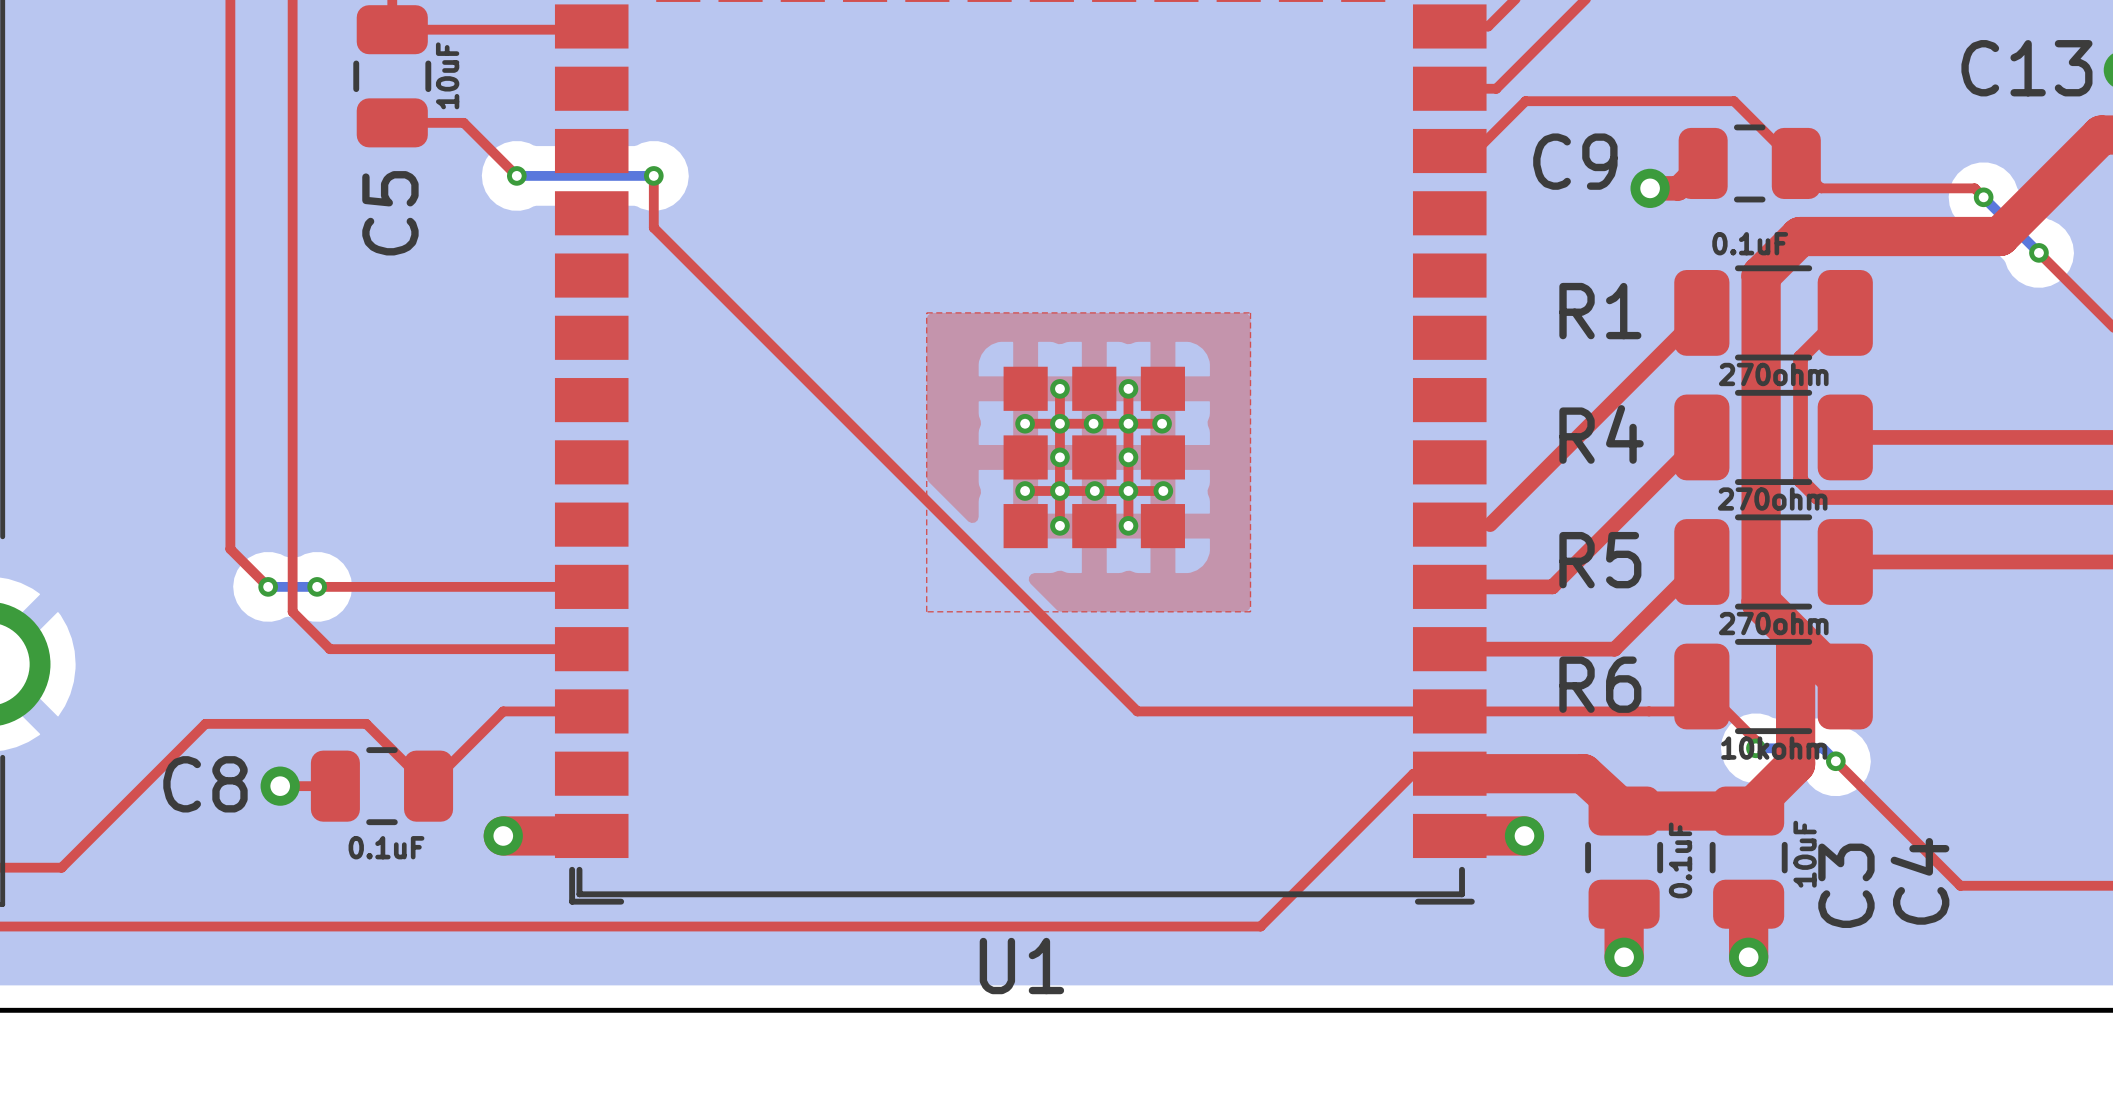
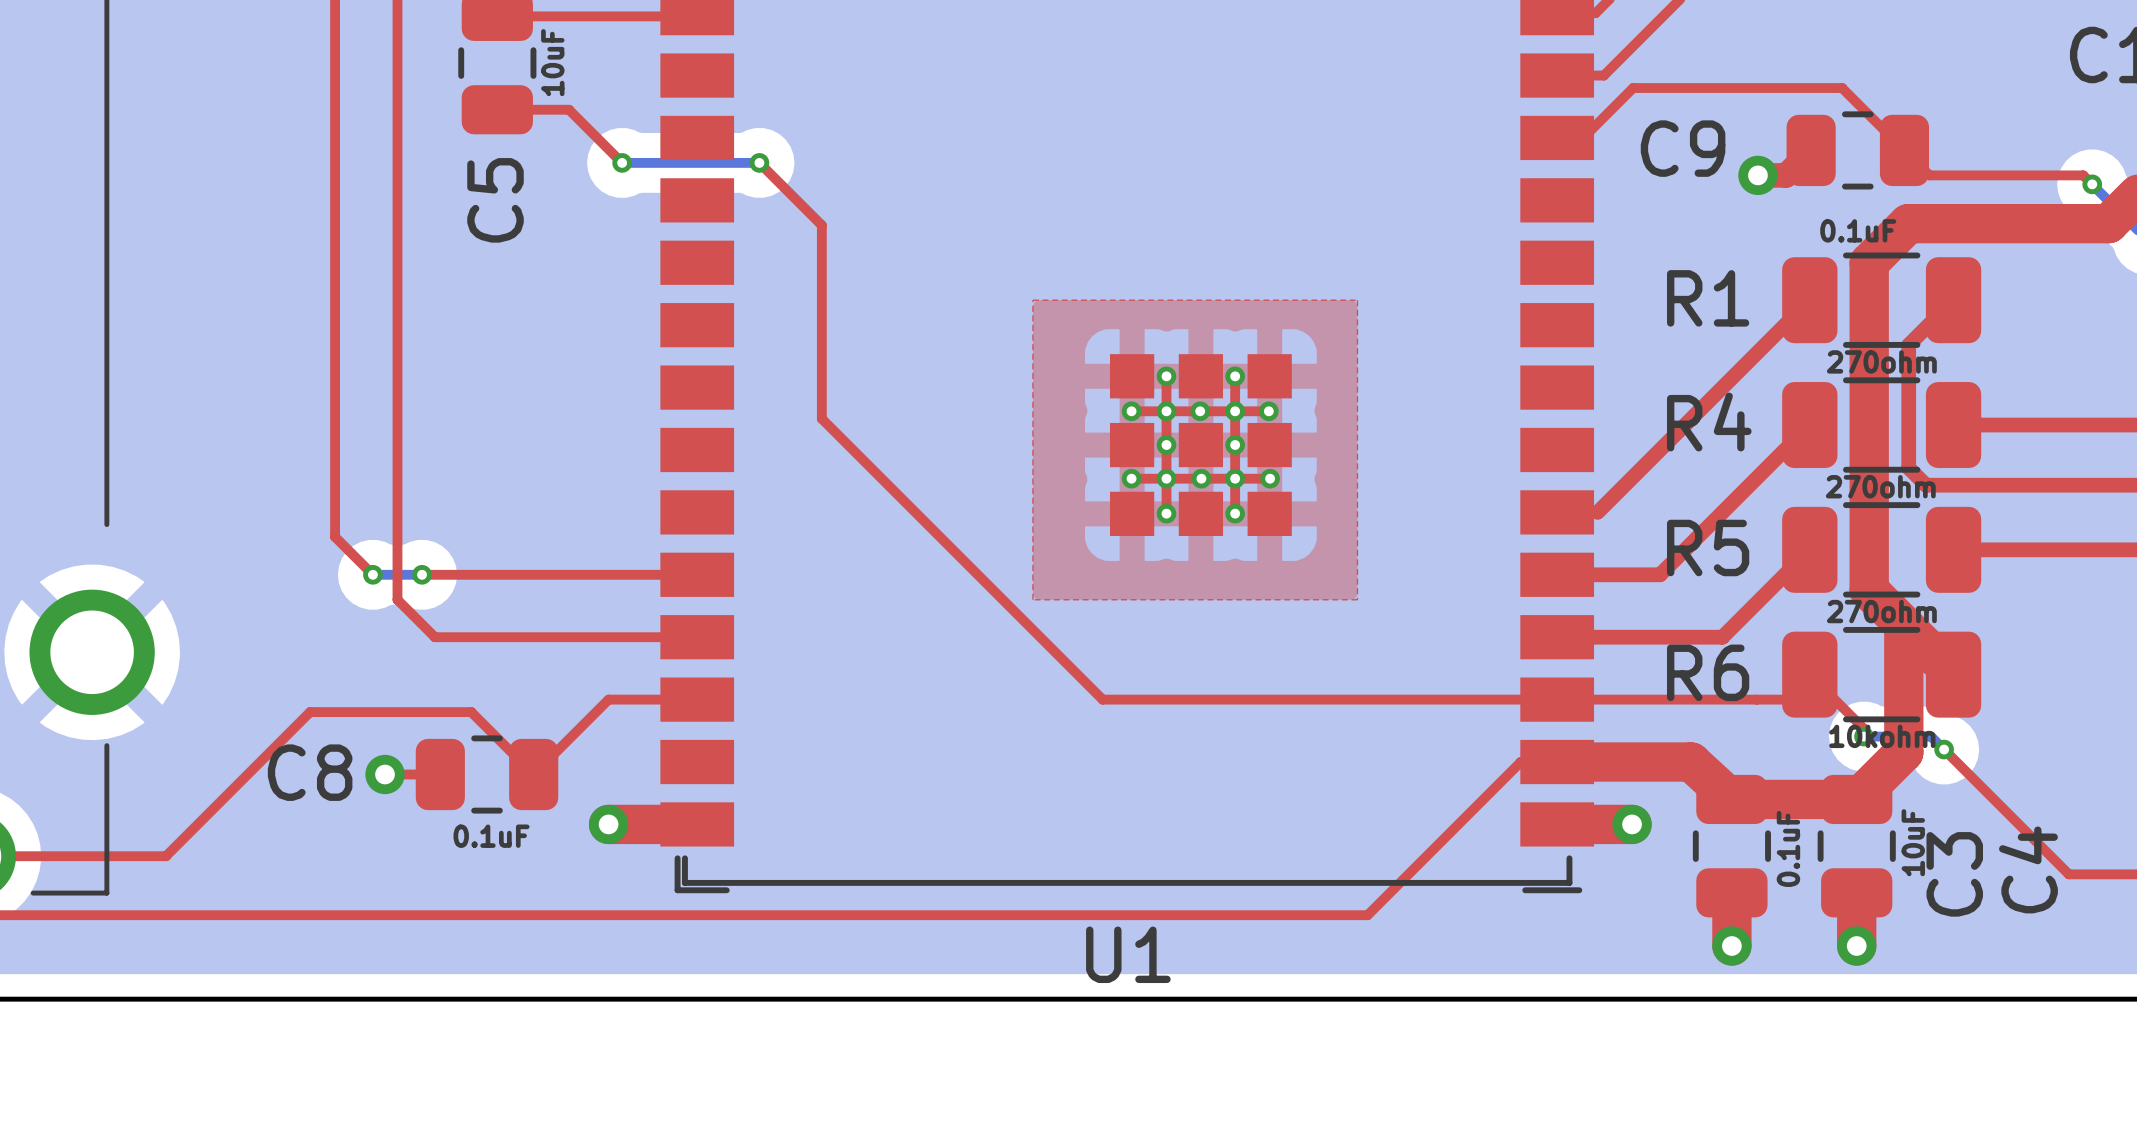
top track: (653, 175) (653, 227) (1137, 711) -> (759, 162) (821, 225) (821, 418) (1102, 699) (1244, 699)

